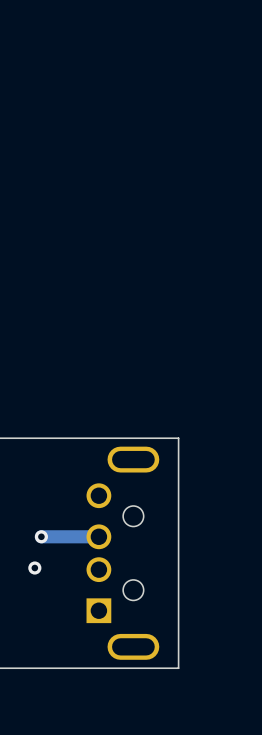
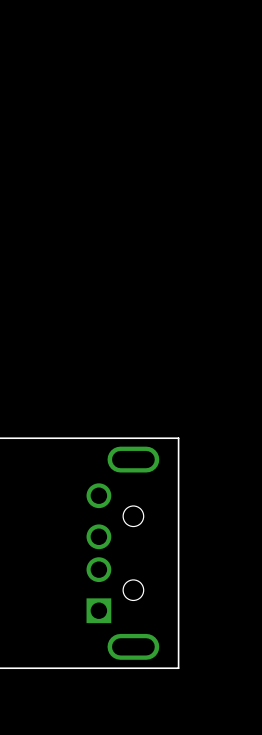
via: (41, 536) -> none
track: (98, 536) (41, 536) -> none
via: (34, 568) -> none

